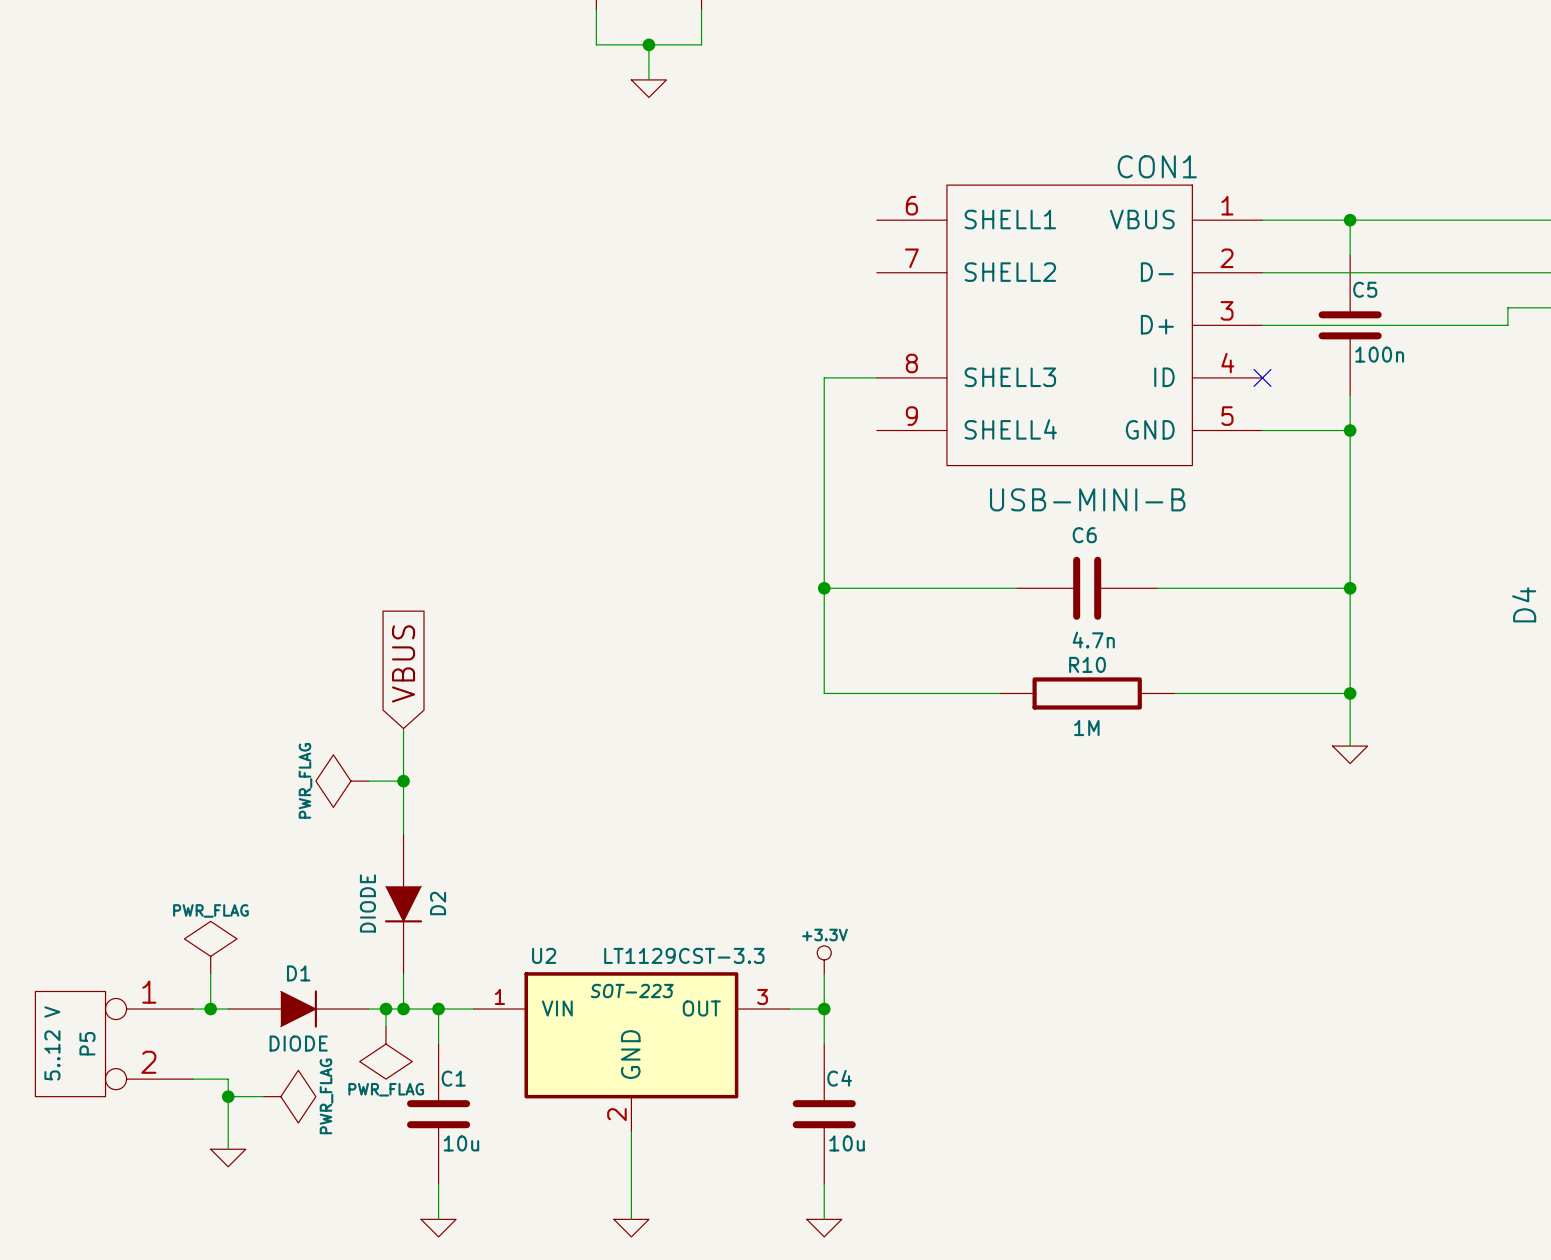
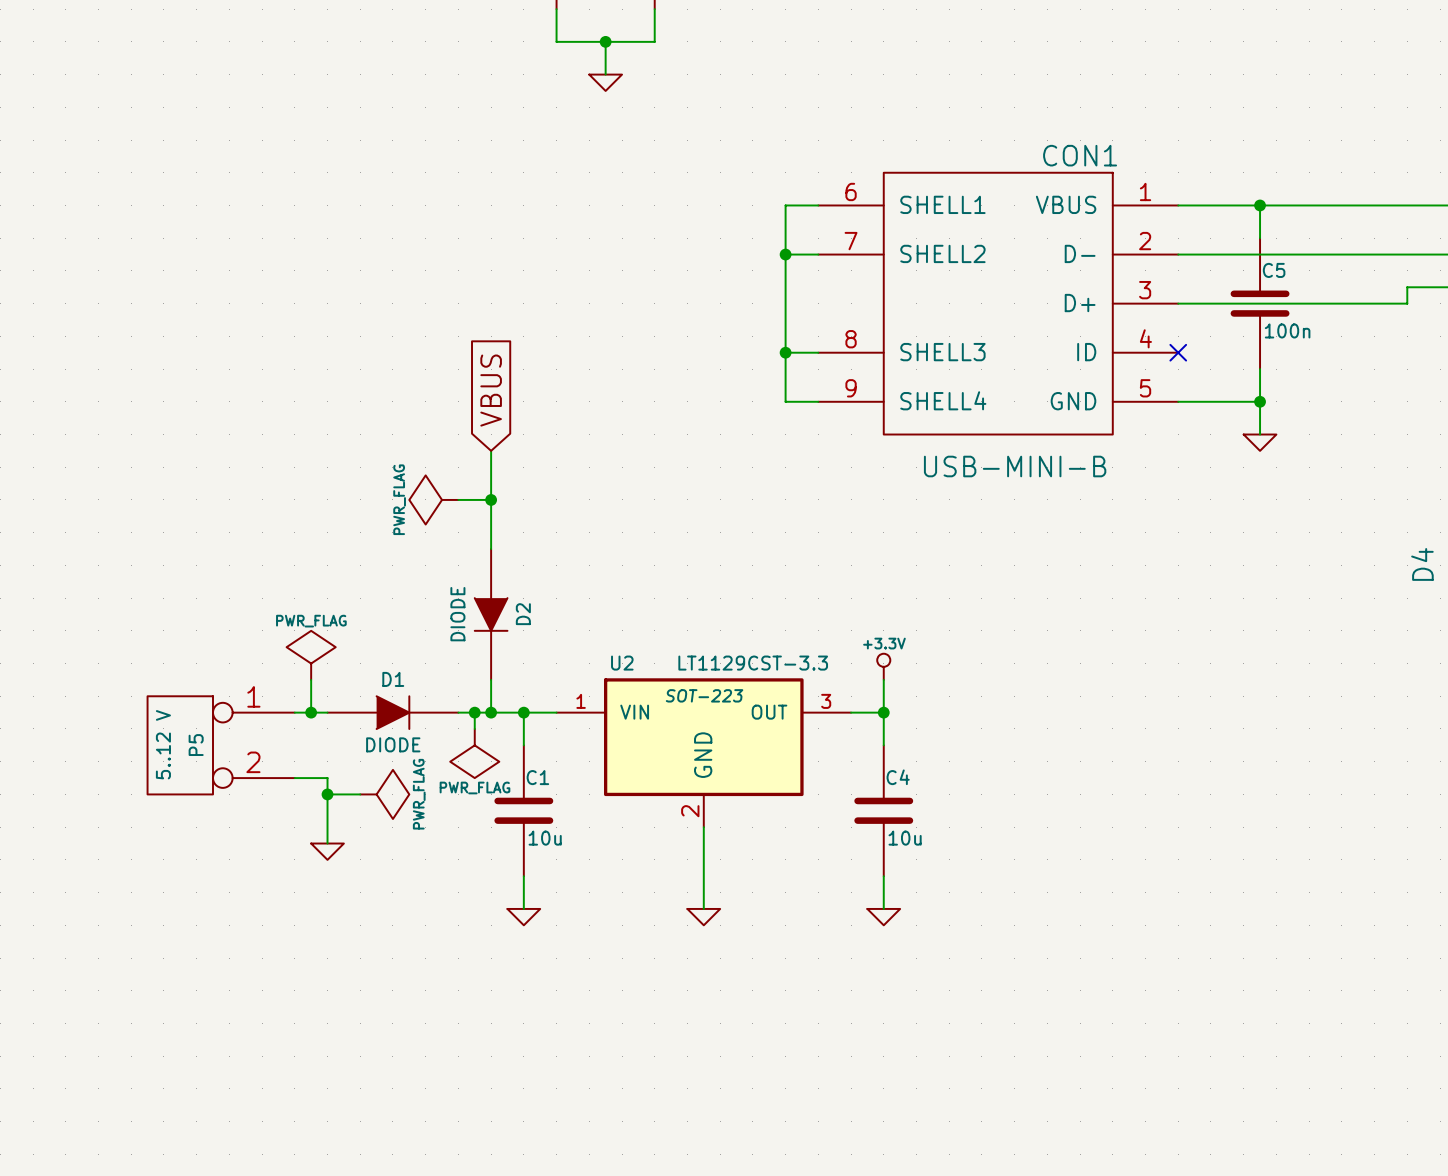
wire: none -> (818, 205) (785, 205) (785, 401) (818, 401)
wire: none -> (785, 254) (818, 254)
junction: none -> (785, 254)
wire: (841, 377) (824, 377) (824, 693) (999, 693) -> none
junction: none -> (785, 352)
wire: (1350, 465) (1350, 746) -> none
power symbol: none -> (1260, 442)
power symbol: none -> PWR_FLAG (433, 499)
junction: none -> (491, 499)
wire: (824, 588) (1017, 588) -> none
junction: (824, 588) -> none
C6: 4.7n (1087, 588) -> none
wire: (1157, 588) (1350, 588) -> none
junction: (1350, 588) -> none
global label position: VBUS (403, 663) -> VBUS (491, 390)
R10: 1M (1087, 693) -> none
wire: (1174, 693) (1350, 693) -> none
junction: (1350, 693) -> none
power symbol: none -> PWR_FLAG (311, 655)
wire: (403, 728) (403, 833) -> (491, 450) (491, 549)
power symbol: (1350, 754) -> none
junction: none -> (311, 712)
junction: none -> (474, 712)
junction: none -> (491, 712)
junction: none -> (523, 712)
junction: none -> (883, 712)
power symbol: PWR_FLAG (342, 781) -> none
wire: (368, 781) (403, 781) -> (458, 499) (491, 499)
junction: (403, 781) -> none
power symbol: none -> PWR_FLAG (474, 753)
junction: none -> (327, 794)
power symbol: none -> PWR_FLAG (384, 794)
D2 position: (403, 903) -> (491, 614)
power symbol: none -> (327, 851)
power symbol: PWR_FLAG (210, 947) -> none
power symbol position: +3.3V (824, 959) -> +3.3V (883, 666)
wire: (210, 973) (210, 1009) -> (311, 679) (311, 712)
wire: (403, 973) (403, 1009) -> (491, 679) (491, 712)
wire: (824, 973) (824, 1044) -> (883, 679) (883, 745)
power symbol: none -> (523, 917)
power symbol: none -> (703, 917)
power symbol: none -> (883, 917)
wire: (193, 1009) (228, 1009) -> (294, 712) (327, 712)
junction: (210, 1009) -> none
D1 position: (298, 1009) -> (392, 712)
wire: (368, 1009) (473, 1009) -> (458, 712) (556, 712)
wire: (385, 1009) (385, 1026) -> (474, 712) (474, 728)
junction: (385, 1009) -> none
junction: (403, 1009) -> none
wire: (438, 1009) (438, 1044) -> (523, 712) (523, 745)
junction: (438, 1009) -> none
wire: (789, 1009) (824, 1009) -> (851, 712) (883, 712)
junction: (824, 1009) -> none
P5 position: (114, 1044) -> (221, 745)
U2 position: (631, 1051) -> (703, 752)
power symbol: PWR_FLAG (385, 1052) -> none
wire: (193, 1079) (228, 1079) (228, 1149) -> (294, 778) (327, 778) (327, 843)
wire: (228, 1096) (263, 1096) -> (327, 794) (360, 794)
junction: (228, 1096) -> none
power symbol: PWR_FLAG (289, 1096) -> none
C1 position: (438, 1114) -> (523, 810)
C4 position: (824, 1114) -> (883, 810)
wire: (631, 1131) (631, 1219) -> (703, 827) (703, 908)
power symbol: (228, 1158) -> none
wire: (438, 1184) (438, 1219) -> (523, 876) (523, 908)
wire: (824, 1184) (824, 1219) -> (883, 876) (883, 908)
power symbol: (438, 1228) -> none
power symbol: (631, 1228) -> none
power symbol: (824, 1228) -> none

